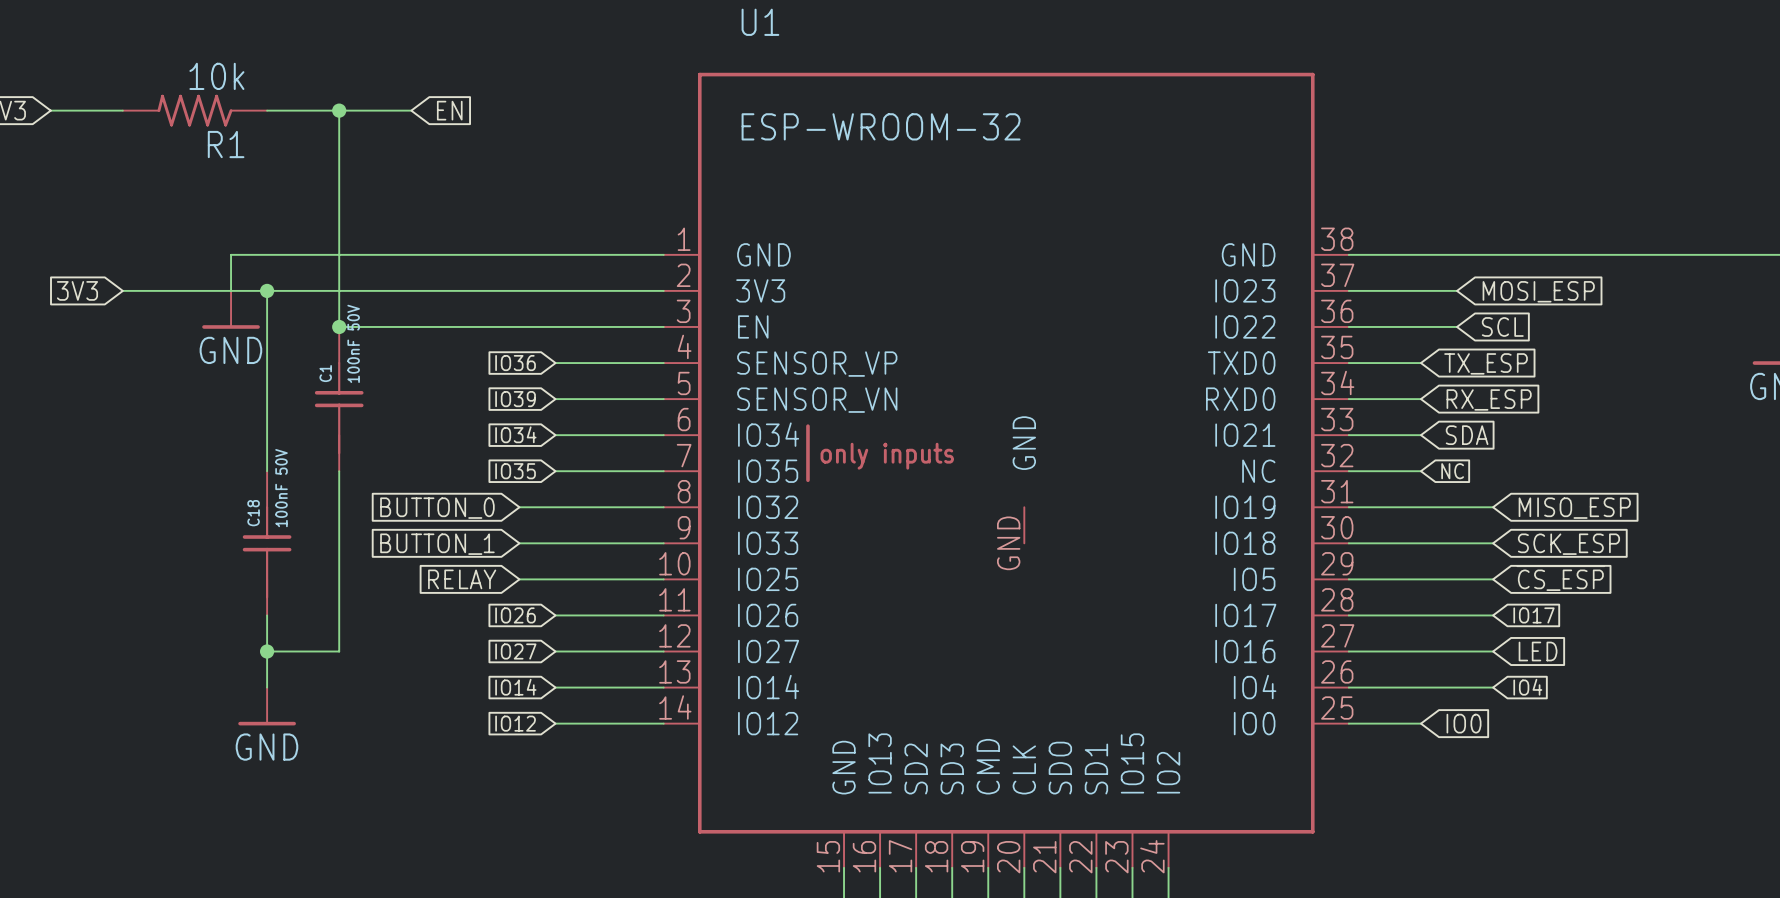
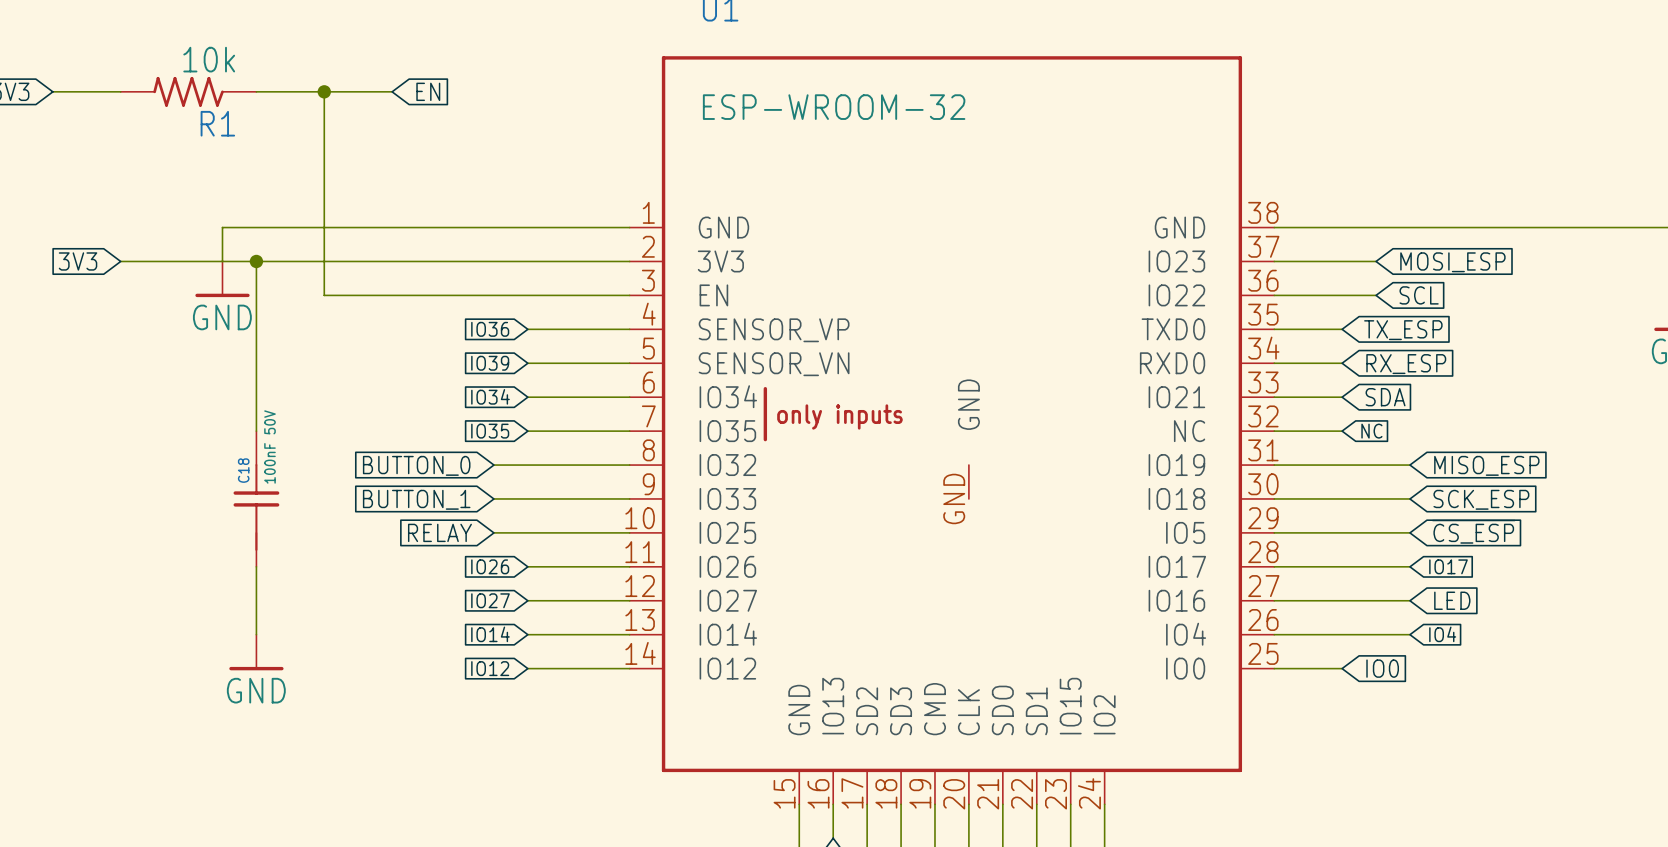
junction: (339, 326) -> none
C1: 100nF 50V (339, 399) -> none
wire: (339, 471) (339, 651) (267, 651) -> none
junction: (267, 651) -> none

